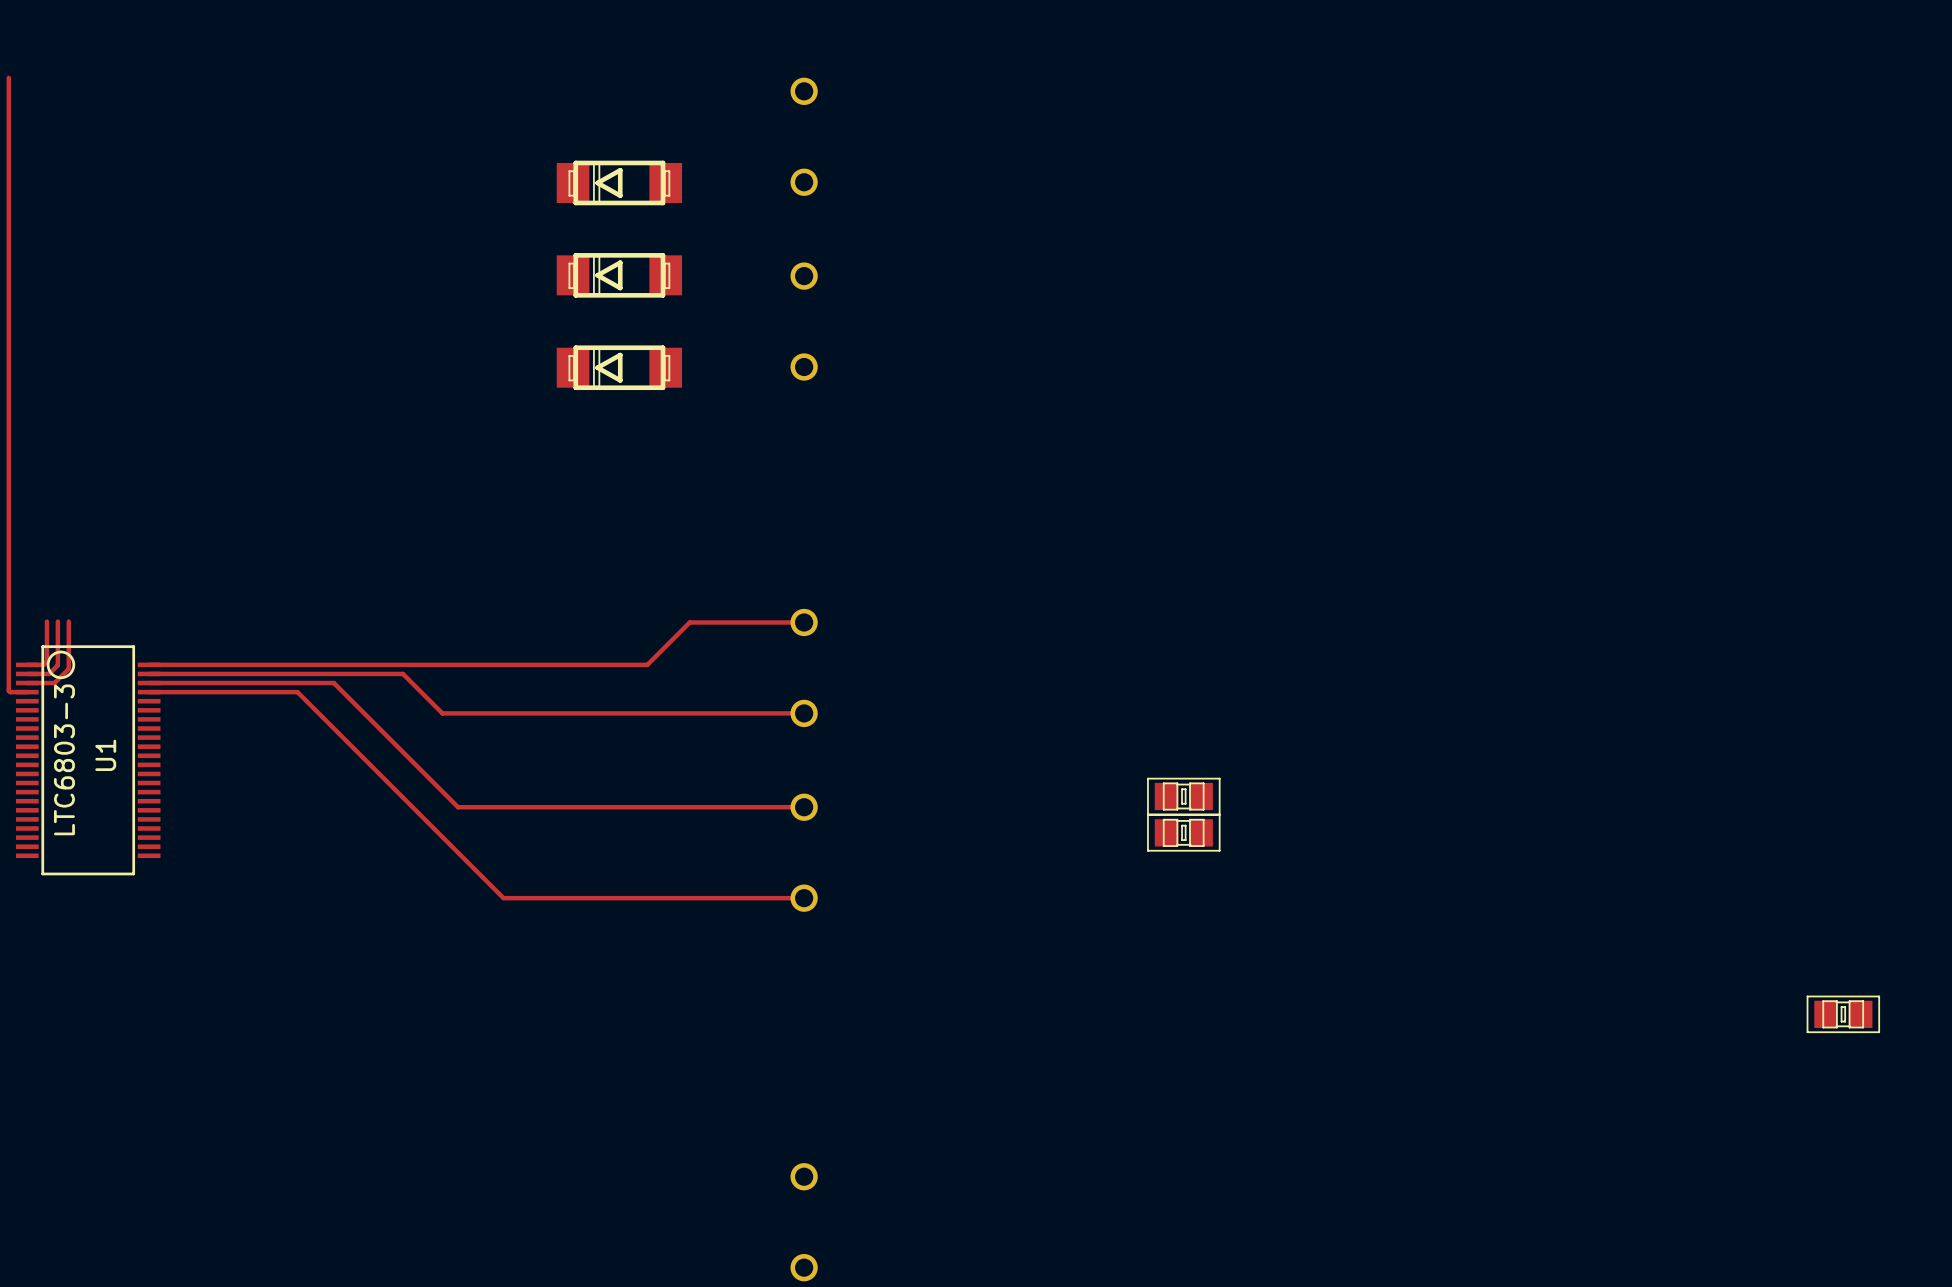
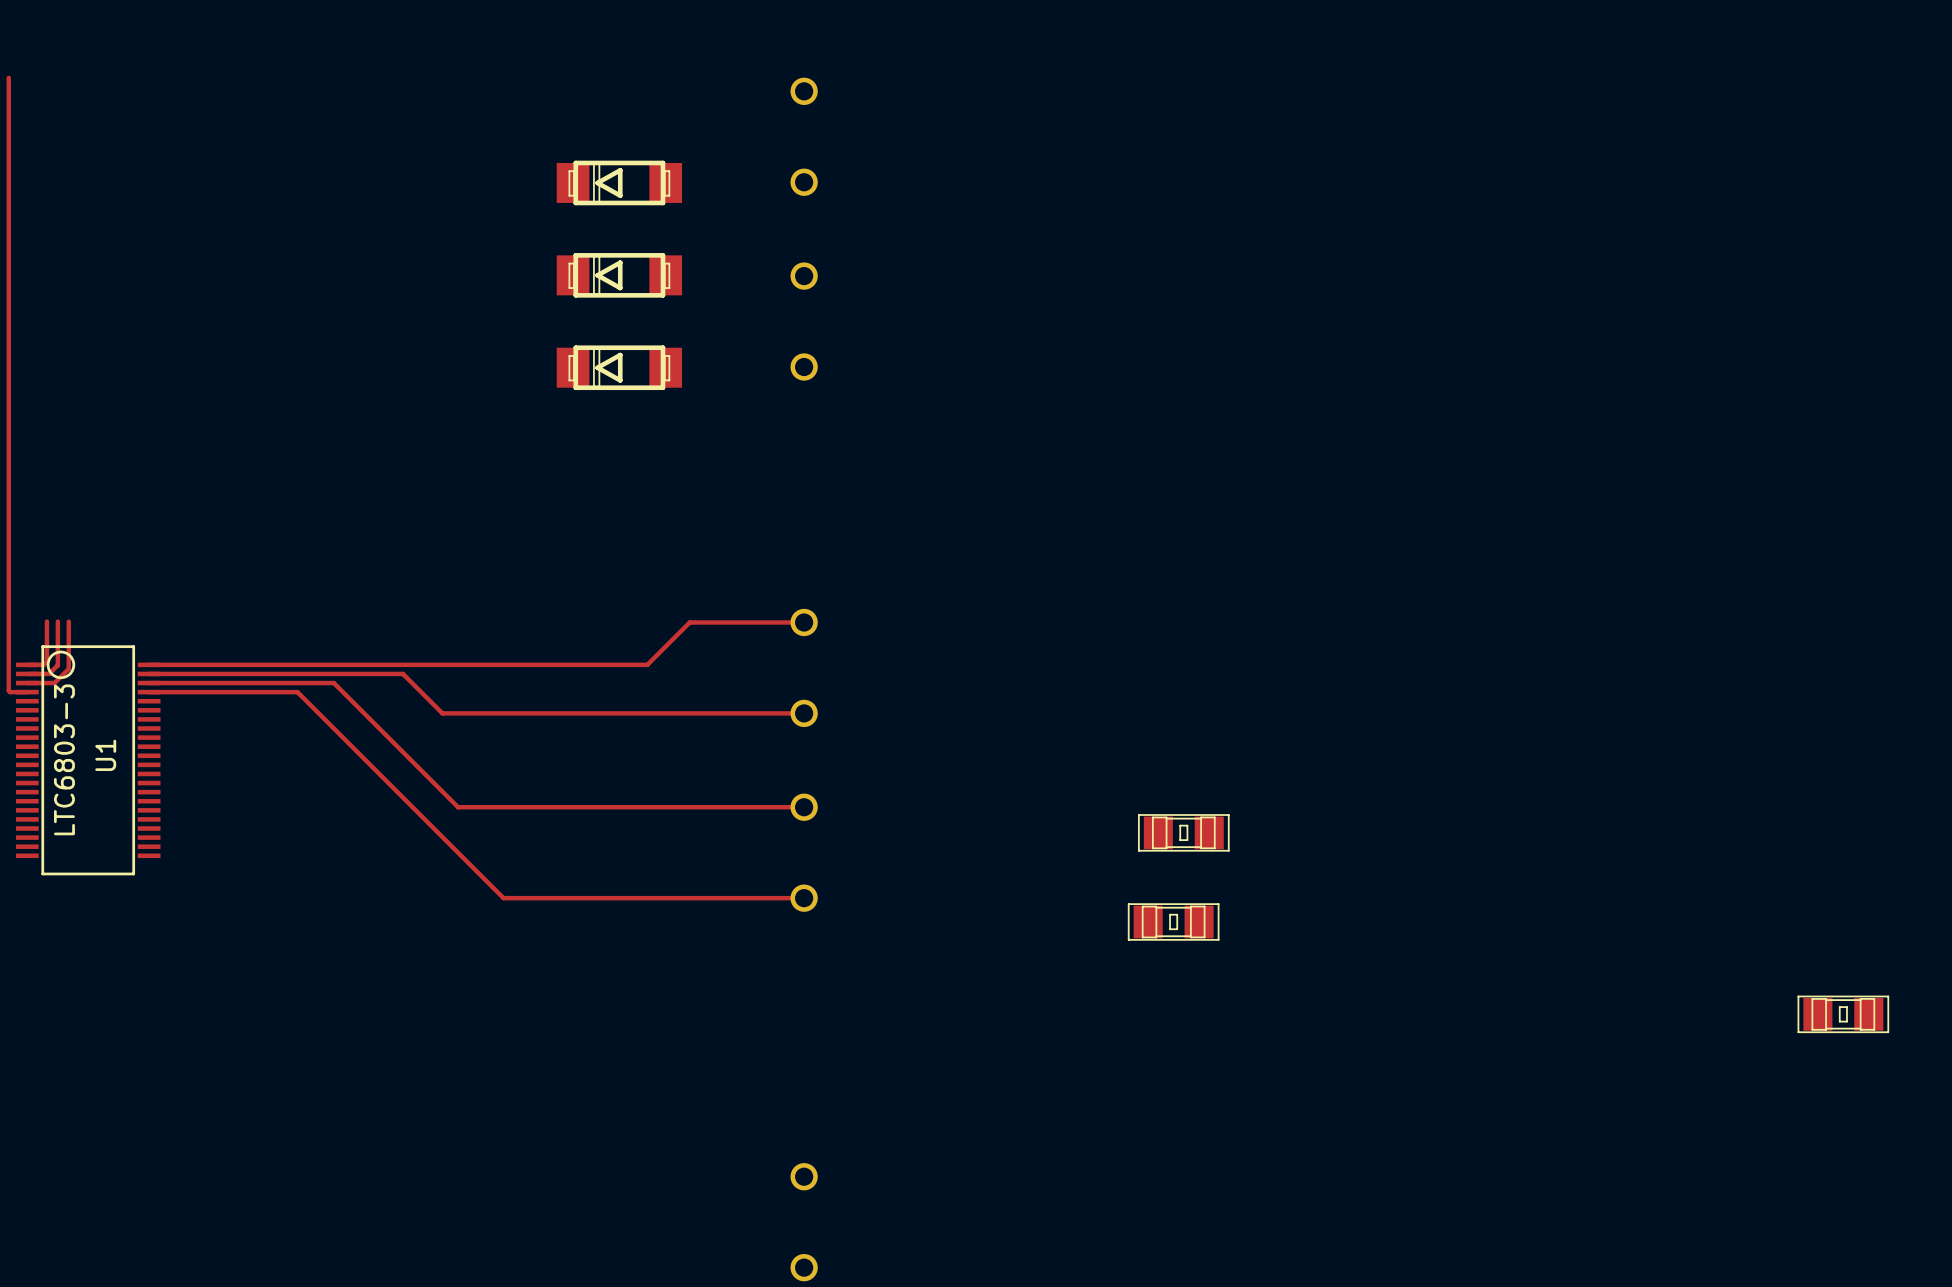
part: (1183, 796) -> none
part footprint: [1147, 814, 1221, 852] -> [1138, 814, 1230, 852]
part: none -> (1173, 921)
part footprint: [1807, 996, 1880, 1033] -> [1797, 996, 1889, 1033]

